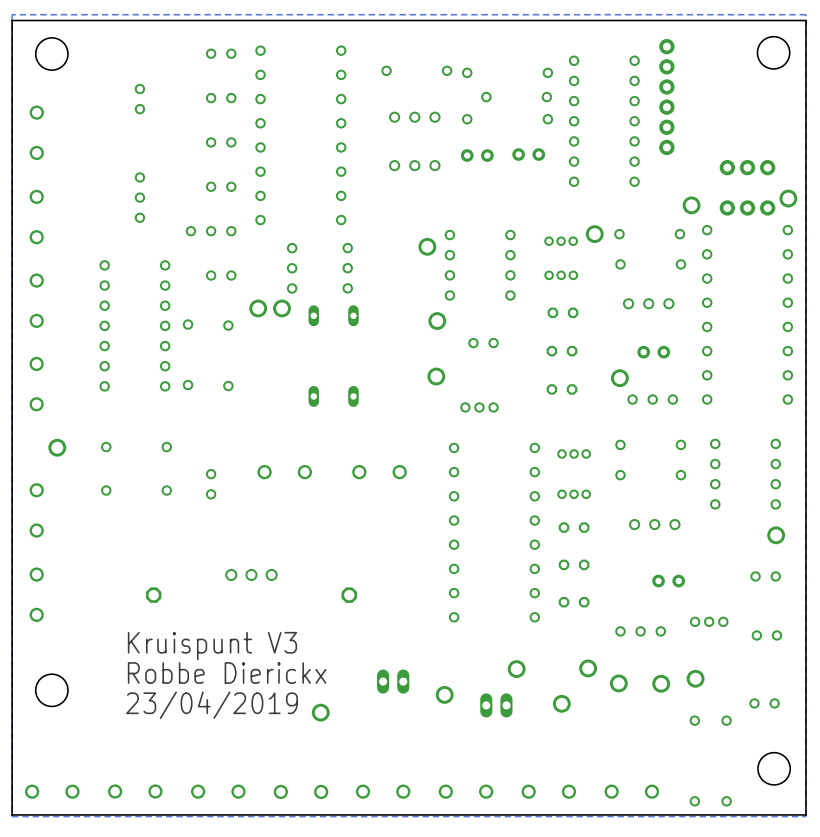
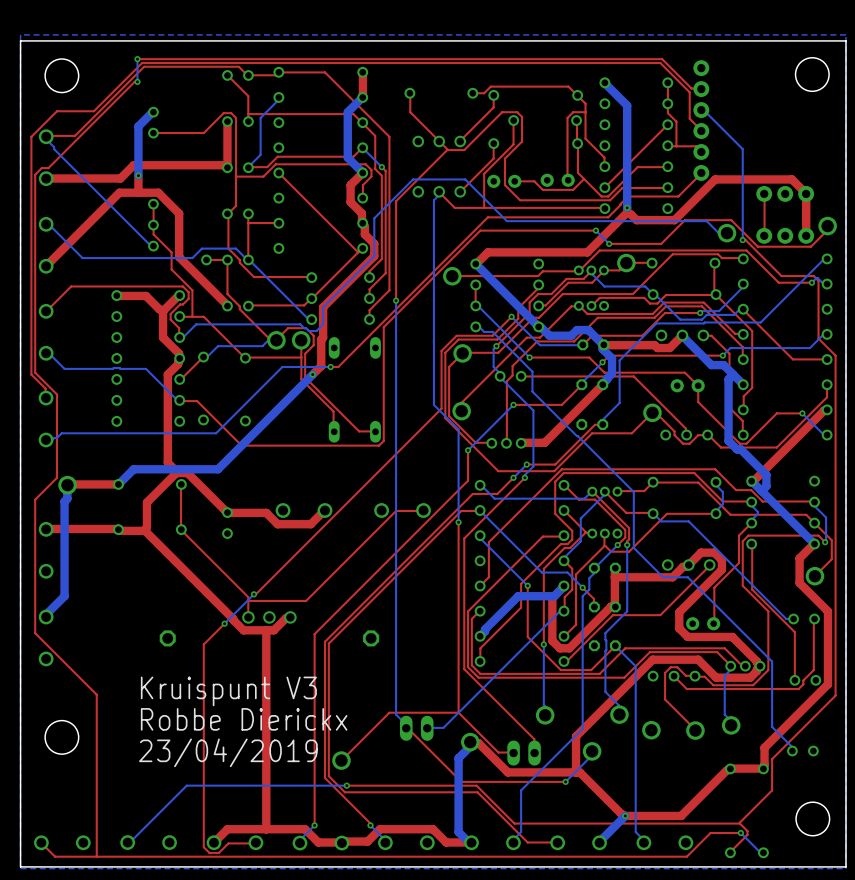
top track: none -> (137, 59) (662, 59) (691, 88) (701, 89)
bottom track: none -> (137, 59) (137, 81)
via: none -> (137, 59)
top track: none -> (362, 72) (362, 97)
top track: none -> (227, 75) (248, 96) (248, 121)
top track: none -> (137, 81) (134, 81) (48, 168) (41, 168) (35, 174) (35, 372) (56, 394) (56, 477) (35, 499) (35, 633) (96, 694) (96, 856)
via: none -> (137, 81)
bottom track: none -> (604, 82) (627, 105) (627, 207)
top track: none -> (667, 82) (667, 103)
top track: none -> (409, 93) (410, 112) (448, 150)
top track: none -> (472, 93) (484, 93) (490, 86) (568, 86) (585, 103) (585, 138) (604, 157) (604, 166)
top track: none -> (493, 95) (493, 107) (460, 141)
bottom track: none -> (278, 97) (260, 117) (260, 154) (248, 167)
bottom track: none -> (362, 97) (347, 112) (347, 157) (362, 172)
top track: none -> (667, 103) (667, 113) (676, 121) (676, 146)
bottom track: none -> (701, 110) (703, 110) (742, 149) (742, 240)
bottom track: none -> (153, 112) (138, 126) (138, 175)
top track: none -> (585, 112) (573, 112) (567, 117) (568, 180)
top track: none -> (248, 114) (353, 114) (375, 135) (375, 169) (381, 175) (381, 259) (369, 271) (369, 277)
top track: none -> (513, 120) (513, 144) (484, 173) (484, 207)
top track: none -> (576, 120) (577, 172) (601, 196) (608, 196) (637, 167) (667, 166)
top track: none -> (227, 121) (227, 167) (223, 165) (133, 165) (120, 178) (46, 178)
top track: none -> (667, 124) (604, 187)
top track: none -> (701, 131) (689, 118) (689, 92) (660, 62) (142, 62) (93, 111) (56, 111) (31, 136) (31, 374) (45, 388) (46, 398)
top track: none -> (153, 133) (203, 133) (223, 113) (231, 113) (236, 117) (236, 205) (227, 213) (228, 248) (253, 277) (311, 277)
top track: none -> (46, 136) (74, 135) (144, 66) (238, 66) (248, 75) (275, 75) (278, 72) (325, 72) (389, 136) (389, 290) (369, 310) (369, 319)
bottom track: none -> (46, 136) (54, 149) (150, 245) (153, 246)
top track: none -> (493, 143) (493, 158) (460, 191)
top track: none -> (667, 145) (696, 146) (701, 151)
top track: none -> (362, 147) (353, 156) (277, 156) (267, 167) (248, 167)
bottom track: none -> (362, 147) (381, 167)
top track: none -> (381, 167) (385, 170) (385, 273) (369, 289) (369, 298)
via: none -> (381, 167)
top track: none -> (278, 172) (358, 252)
top track: none -> (362, 172) (350, 185) (350, 202) (361, 213) (364, 234) (374, 243) (374, 256) (323, 307) (321, 366) (312, 374)
top track: none -> (701, 172) (678, 196) (628, 196) (608, 217) (487, 217) (338, 367) (330, 367)
top track: none -> (138, 175) (138, 192)
via: none -> (138, 175)
top track: none -> (236, 176) (263, 176) (275, 164) (365, 164) (371, 169) (371, 176) (362, 185) (362, 198)
top track: none -> (584, 178) (573, 189) (542, 189) (534, 181) (514, 181)
top track: none -> (667, 187) (622, 187) (610, 200) (520, 200) (505, 185) (505, 158) (522, 141) (522, 116) (517, 112) (502, 112) (464, 150) (447, 150) (396, 201) (396, 300)
top track: none -> (439, 191) (454, 207) (604, 208)
bottom track: none -> (439, 191) (438, 195) (433, 200) (433, 404) (458, 429) (458, 522)
top track: none -> (764, 193) (764, 235)
top track: none -> (153, 204) (153, 234) (171, 252) (171, 269) (192, 290) (192, 316)
via: none -> (627, 207)
top track: none -> (627, 212) (587, 252) (487, 252) (475, 263)
top track: none -> (627, 212) (636, 220) (674, 220) (715, 179) (792, 179) (806, 193) (806, 235)
top track: none -> (248, 213) (248, 259)
top track: none -> (248, 223) (278, 223)
bottom track: none -> (46, 224) (49, 224) (82, 258) (192, 258) (201, 248) (236, 248) (307, 318) (311, 319)
top track: none -> (827, 226) (827, 230) (810, 246) (757, 246) (731, 220) (684, 220) (661, 243) (609, 243)
top track: none -> (595, 230) (480, 230) (383, 327) (383, 440) (379, 445) (241, 445) (197, 401) (179, 400)
bottom track: none -> (595, 230) (609, 243)
via: none -> (595, 230)
bottom track: none -> (727, 233) (718, 232) (706, 221) (506, 221) (465, 179) (413, 179) (374, 218) (374, 256) (323, 307) (323, 324) (316, 331) (308, 331) (300, 324) (196, 324) (183, 336) (179, 337)
top track: none -> (742, 240) (745, 240) (781, 276) (813, 276) (818, 280) (818, 338) (835, 355) (835, 695) (772, 759) (772, 790) (739, 823)
via: none -> (742, 240)
via: none -> (609, 243)
top track: none -> (362, 248) (304, 305) (248, 306)
top track: none -> (743, 258) (721, 258) (718, 254) (672, 254) (632, 294) (562, 294) (539, 317) (533, 317) (498, 352) (463, 352) (449, 367) (449, 416) (475, 442) (491, 443)
bottom track: none -> (827, 259) (824, 259) (760, 322) (656, 323) (619, 360) (619, 403) (602, 420) (602, 424)
top track: none -> (206, 259) (227, 259) (227, 294) (270, 339) (276, 340) (288, 328) (306, 328) (313, 335) (313, 345) (305, 353) (305, 377) (359, 431) (375, 431)
top track: none -> (652, 263) (627, 262) (619, 270) (603, 270) (592, 282) (568, 282) (545, 305) (538, 305)
top track: none -> (714, 263) (714, 294) (716, 294)
bottom track: none -> (475, 263) (549, 335) (571, 335) (576, 330) (588, 330) (603, 344) (602, 349) (612, 358) (612, 373) (602, 384)
top track: none -> (46, 266) (119, 192) (158, 192) (179, 213) (179, 257) (227, 306)
top track: none -> (591, 270) (583, 278) (566, 278) (551, 294) (538, 294) (529, 302) (529, 313) (496, 346)
bottom track: none -> (591, 270) (592, 274) (604, 286) (645, 286) (680, 319) (702, 319) (706, 314) (734, 314) (743, 309)
top track: none -> (452, 276) (538, 276) (542, 271) (577, 271) (599, 250) (746, 250) (778, 282) (811, 282)
bottom track: none -> (811, 282) (817, 277) (823, 283) (827, 284)
via: none -> (811, 282)
bottom track: none -> (743, 284) (742, 287) (719, 311) (702, 311) (700, 313)
top track: none -> (475, 284) (475, 305)
top track: none -> (538, 284) (538, 288) (518, 308) (518, 318) (497, 339) (458, 339) (445, 352) (445, 418) (498, 471) (554, 471) (592, 433) (631, 433) (652, 412) (656, 413) (674, 431) (674, 435) (683, 443) (689, 443) (698, 435) (707, 435) (720, 447) (776, 447) (827, 397) (827, 384)
top track: none -> (716, 294) (666, 295) (657, 303) (649, 303) (644, 297) (599, 297) (591, 305)
top track: none -> (716, 294) (752, 331) (752, 387) (743, 396) (743, 409)
top track: none -> (116, 295) (146, 295) (163, 311)
top track: none -> (179, 295) (163, 311)
bottom track: none -> (396, 300) (396, 714) (405, 724) (406, 728)
via: none -> (396, 300)
bottom track: none -> (475, 305) (478, 306) (529, 357)
top track: none -> (743, 309) (792, 359) (827, 359)
top track: none -> (46, 311) (71, 286) (182, 286) (188, 292) (188, 298) (170, 313) (170, 319) (179, 328) (179, 337)
top track: none -> (163, 311) (163, 337) (179, 353) (179, 358) (178, 364) (167, 374) (167, 462) (176, 473)
top track: none -> (700, 313) (665, 313) (642, 335) (592, 335) (582, 344)
via: none -> (700, 313)
top track: none -> (179, 316) (203, 316) (245, 358) (301, 357)
top track: none -> (511, 316) (492, 335) (456, 335) (441, 350) (441, 408) (253, 594)
bottom track: none -> (511, 316) (540, 345) (582, 344)
via: none -> (511, 316)
bottom track: none -> (475, 326) (479, 327) (484, 331) (492, 331) (532, 371) (532, 391) (633, 492) (633, 547) (663, 577) (687, 577) (772, 661) (772, 726) (792, 746) (792, 751)
top track: none -> (743, 334) (735, 333) (703, 302) (664, 302) (652, 313) (587, 313) (578, 305) (571, 306) (540, 337) (526, 337) (462, 402) (461, 411)
bottom track: none -> (827, 334) (823, 334) (810, 348) (730, 348) (722, 355)
top track: none -> (682, 335) (669, 348) (657, 348) (654, 345) (603, 344)
bottom track: none -> (682, 335) (711, 365) (723, 365) (743, 384)
top track: none -> (703, 335) (711, 335) (729, 353) (729, 407) (742, 420) (743, 435)
bottom track: none -> (276, 340) (268, 340) (262, 346) (218, 346) (207, 356) (203, 357)
top track: none -> (301, 340) (301, 379) (333, 411) (334, 431)
bottom track: none -> (496, 346) (493, 349) (493, 367) (499, 372) (499, 376) (533, 410) (533, 466) (524, 474) (524, 477)
via: none -> (496, 346)
bottom track: none -> (46, 353) (49, 353) (64, 368) (146, 368) (179, 400)
top track: none -> (722, 355) (609, 355) (602, 362)
via: none -> (722, 355)
top track: none -> (203, 357) (179, 379)
top track: none -> (529, 357) (589, 357) (604, 372) (684, 372) (698, 385) (698, 402) (739, 443) (746, 443) (776, 413) (802, 413)
via: none -> (529, 357)
top track: none -> (743, 359) (742, 347) (702, 306) (666, 306) (654, 317) (597, 317) (574, 341) (537, 341) (512, 366) (512, 375) (506, 381) (506, 443)
bottom track: none -> (602, 362) (581, 384)
via: none -> (602, 362)
bottom track: none -> (330, 367) (282, 367) (216, 433) (61, 433) (56, 438) (46, 439)
via: none -> (330, 367)
bottom track: none -> (312, 374) (218, 469) (133, 469) (118, 484)
via: none -> (312, 374)
bottom track: none -> (733, 374) (728, 379) (728, 440) (737, 449) (740, 449) (766, 474) (766, 486) (761, 491)
top track: none -> (521, 376) (633, 376) (685, 428) (686, 435)
top track: none -> (581, 384) (561, 404) (513, 404)
top track: none -> (602, 384) (544, 442) (521, 443)
bottom track: none -> (513, 404) (468, 450)
via: none -> (513, 404)
top track: none -> (827, 409) (751, 481)
bottom track: none -> (802, 413) (823, 434) (827, 435)
via: none -> (802, 413)
top track: none -> (602, 424) (594, 424) (555, 464) (526, 464)
top track: none -> (468, 450) (468, 480) (314, 634) (314, 825)
via: none -> (468, 450)
bottom track: none -> (526, 464) (513, 477)
via: none -> (526, 464)
top track: none -> (176, 473) (187, 473) (228, 512) (266, 512) (277, 524) (310, 524) (324, 510)
top track: none -> (176, 473) (146, 502) (146, 527) (145, 530)
top track: none -> (513, 477) (497, 493) (472, 493) (325, 641) (325, 778) (370, 825)
via: none -> (513, 477)
top track: none -> (524, 477) (464, 538) (464, 669) (534, 739) (534, 753)
via: none -> (524, 477)
bottom track: none -> (751, 481) (814, 544)
bottom track: none -> (716, 482) (716, 485) (722, 492) (722, 504) (716, 513)
bottom track: none -> (67, 485) (67, 498) (64, 501) (64, 596) (46, 614) (46, 617)
top track: none -> (118, 484) (67, 485)
top track: none -> (181, 484) (181, 529) (248, 597) (248, 617)
bottom track: none -> (480, 485) (494, 498) (584, 498) (592, 491)
top track: none -> (564, 485) (578, 499) (594, 499) (625, 529) (625, 537) (617, 545)
top track: none -> (592, 491) (629, 528) (627, 545)
top track: none -> (604, 491) (626, 512) (653, 513)
bottom track: none -> (604, 491) (604, 494) (580, 518) (580, 541) (564, 557) (564, 560)
top track: none -> (617, 491) (644, 491) (653, 482) (698, 482) (730, 514) (806, 514) (831, 540) (831, 559) (814, 576)
top track: none -> (751, 502) (722, 501) (694, 473) (563, 473) (555, 481) (555, 513) (572, 530) (572, 539) (567, 544) (560, 544) (521, 583) (521, 607) (480, 648) (480, 661)
bottom track: none -> (751, 502) (752, 506) (757, 511) (751, 523)
top track: none -> (814, 502) (762, 501) (751, 490) (736, 490) (715, 469) (561, 469) (488, 542) (488, 577) (480, 585)
bottom track: none -> (814, 502) (814, 506) (826, 517) (825, 542)
top track: none -> (423, 510) (396, 510) (306, 600) (248, 600)
top track: none -> (480, 510) (461, 510) (328, 643) (328, 776) (344, 792) (477, 792) (527, 842) (557, 842)
bottom track: none -> (480, 510) (541, 572) (567, 572) (582, 587)
top track: none -> (564, 510) (586, 532)
bottom track: none -> (653, 513) (661, 521) (688, 521) (786, 618) (793, 619)
top track: none -> (716, 513) (666, 513) (629, 551) (611, 551) (604, 546)
top track: none -> (458, 522) (458, 712)
via: none -> (458, 522)
top track: none -> (751, 523) (738, 535) (738, 563) (714, 587) (713, 623)
top track: none -> (46, 529) (145, 530)
top track: none -> (145, 530) (243, 630) (273, 630) (286, 618) (290, 617)
top track: none -> (592, 533) (585, 532) (570, 547) (564, 547) (543, 568) (543, 644)
top track: none -> (604, 533) (604, 546)
bottom track: none -> (480, 535) (480, 538) (527, 585)
top track: none -> (564, 535) (542, 536) (468, 611) (468, 667) (478, 677) (624, 677) (649, 652) (717, 652) (730, 666)
top track: none -> (825, 542) (818, 535) (748, 535) (742, 541) (742, 585) (768, 611) (768, 670) (753, 685) (713, 685) (704, 676) (685, 675) (677, 667) (670, 667) (665, 672) (665, 699) (695, 730)
via: none -> (825, 542)
top track: none -> (751, 544) (752, 589) (794, 632) (794, 680)
top track: none -> (814, 544) (799, 558) (799, 582) (828, 611) (828, 684) (764, 747) (763, 768) (730, 768) (726, 770) (681, 815) (625, 815) (579, 772) (507, 772) (478, 743) (470, 742)
bottom track: none -> (617, 545) (594, 568) (594, 573) (589, 578) (589, 589) (582, 596) (582, 728) (521, 790) (521, 832) (513, 839) (513, 842)
via: none -> (617, 545)
bottom track: none -> (627, 545) (627, 611) (605, 633) (605, 691) (618, 705) (619, 714)
via: none -> (627, 545)
top track: none -> (604, 546) (576, 574) (576, 624) (564, 636)
top track: none -> (564, 560) (572, 568) (572, 589) (564, 597) (564, 611)
top track: none -> (688, 564) (701, 552) (714, 552) (721, 560) (721, 569) (679, 612) (679, 628) (687, 636) (732, 636) (760, 666) (750, 677) (716, 677) (698, 659) (652, 659) (576, 736) (576, 772)
top track: none -> (688, 565) (683, 566) (672, 577) (614, 577)
top track: none -> (709, 565) (660, 615) (612, 615) (567, 660) (564, 661)
top track: none -> (615, 568) (615, 606) (611, 606) (569, 648) (559, 648) (552, 640) (552, 598) (564, 585)
top track: none -> (527, 585) (527, 636) (560, 670) (591, 670) (615, 645)
via: none -> (527, 585)
bottom track: none -> (564, 585) (554, 596) (518, 596) (480, 636)
top track: none -> (582, 587) (594, 599) (594, 606)
via: none -> (582, 587)
bottom track: none -> (253, 594) (224, 623)
via: none -> (253, 594)
top track: none -> (480, 611) (471, 618) (471, 665) (480, 673) (599, 673) (625, 648) (724, 648) (741, 665) (745, 666)
bottom track: none -> (564, 611) (559, 611) (443, 727) (427, 728)
top track: none -> (814, 619) (813, 670) (803, 680) (803, 684) (798, 689) (686, 689) (674, 676)
top track: none -> (224, 623) (203, 644) (203, 847) (209, 852) (218, 852) (228, 843) (255, 842)
via: none -> (224, 623)
top track: none -> (266, 630) (266, 829)
bottom track: none -> (543, 644) (545, 715)
via: none -> (543, 644)
bottom track: none -> (615, 645) (635, 666) (635, 832) (643, 842)
bottom track: none -> (730, 666) (730, 670) (724, 675) (724, 714) (730, 720) (731, 725)
top track: none -> (458, 712) (498, 752) (513, 753)
top track: none -> (458, 712) (389, 712) (341, 760)
top track: none -> (406, 728) (461, 781) (565, 781)
bottom track: none -> (470, 742) (469, 746) (458, 758) (458, 832) (471, 842)
bottom track: none -> (592, 751) (591, 756) (565, 781)
via: none -> (565, 781)
top track: none -> (346, 785) (476, 785) (514, 823) (739, 823)
bottom track: none -> (346, 785) (186, 785) (129, 842) (127, 842)
via: none -> (346, 785)
bottom track: none -> (625, 815) (599, 842)
via: none -> (625, 815)
top track: none -> (739, 823) (747, 831) (747, 834) (730, 852)
bottom track: none -> (314, 825) (300, 839) (299, 843)
via: none -> (314, 825)
bottom track: none -> (370, 825) (385, 842)
via: none -> (370, 825)
top track: none -> (740, 833) (710, 833) (686, 856) (55, 856) (41, 842)
bottom track: none -> (740, 833) (759, 851) (763, 852)
via: none -> (740, 833)
top track: none -> (471, 842) (446, 842) (433, 829) (379, 829) (367, 841) (341, 843) (318, 842) (305, 829) (227, 829) (213, 842)

